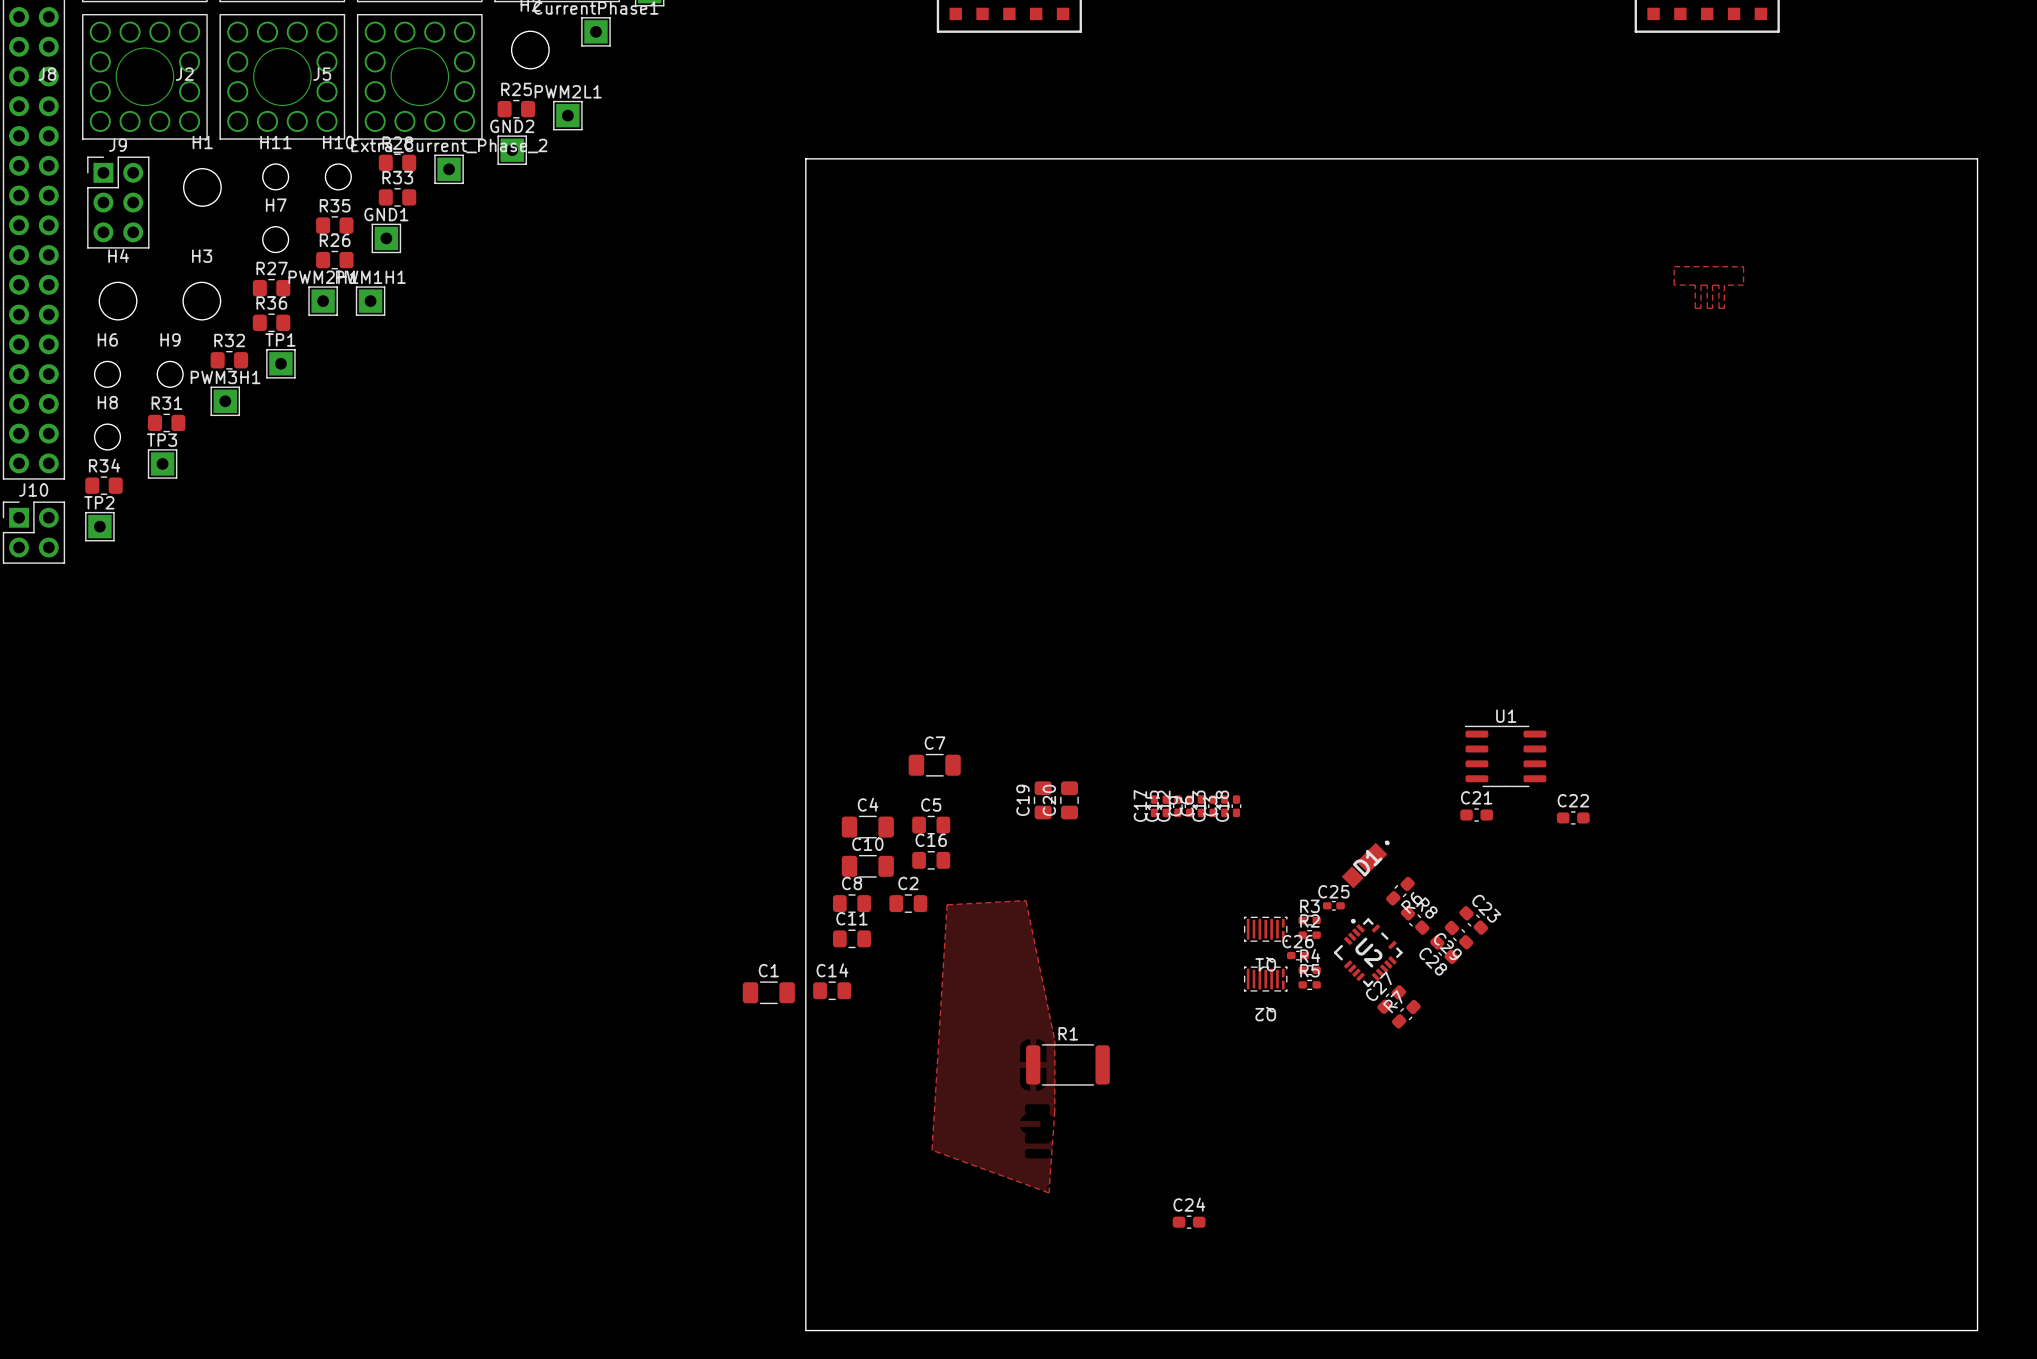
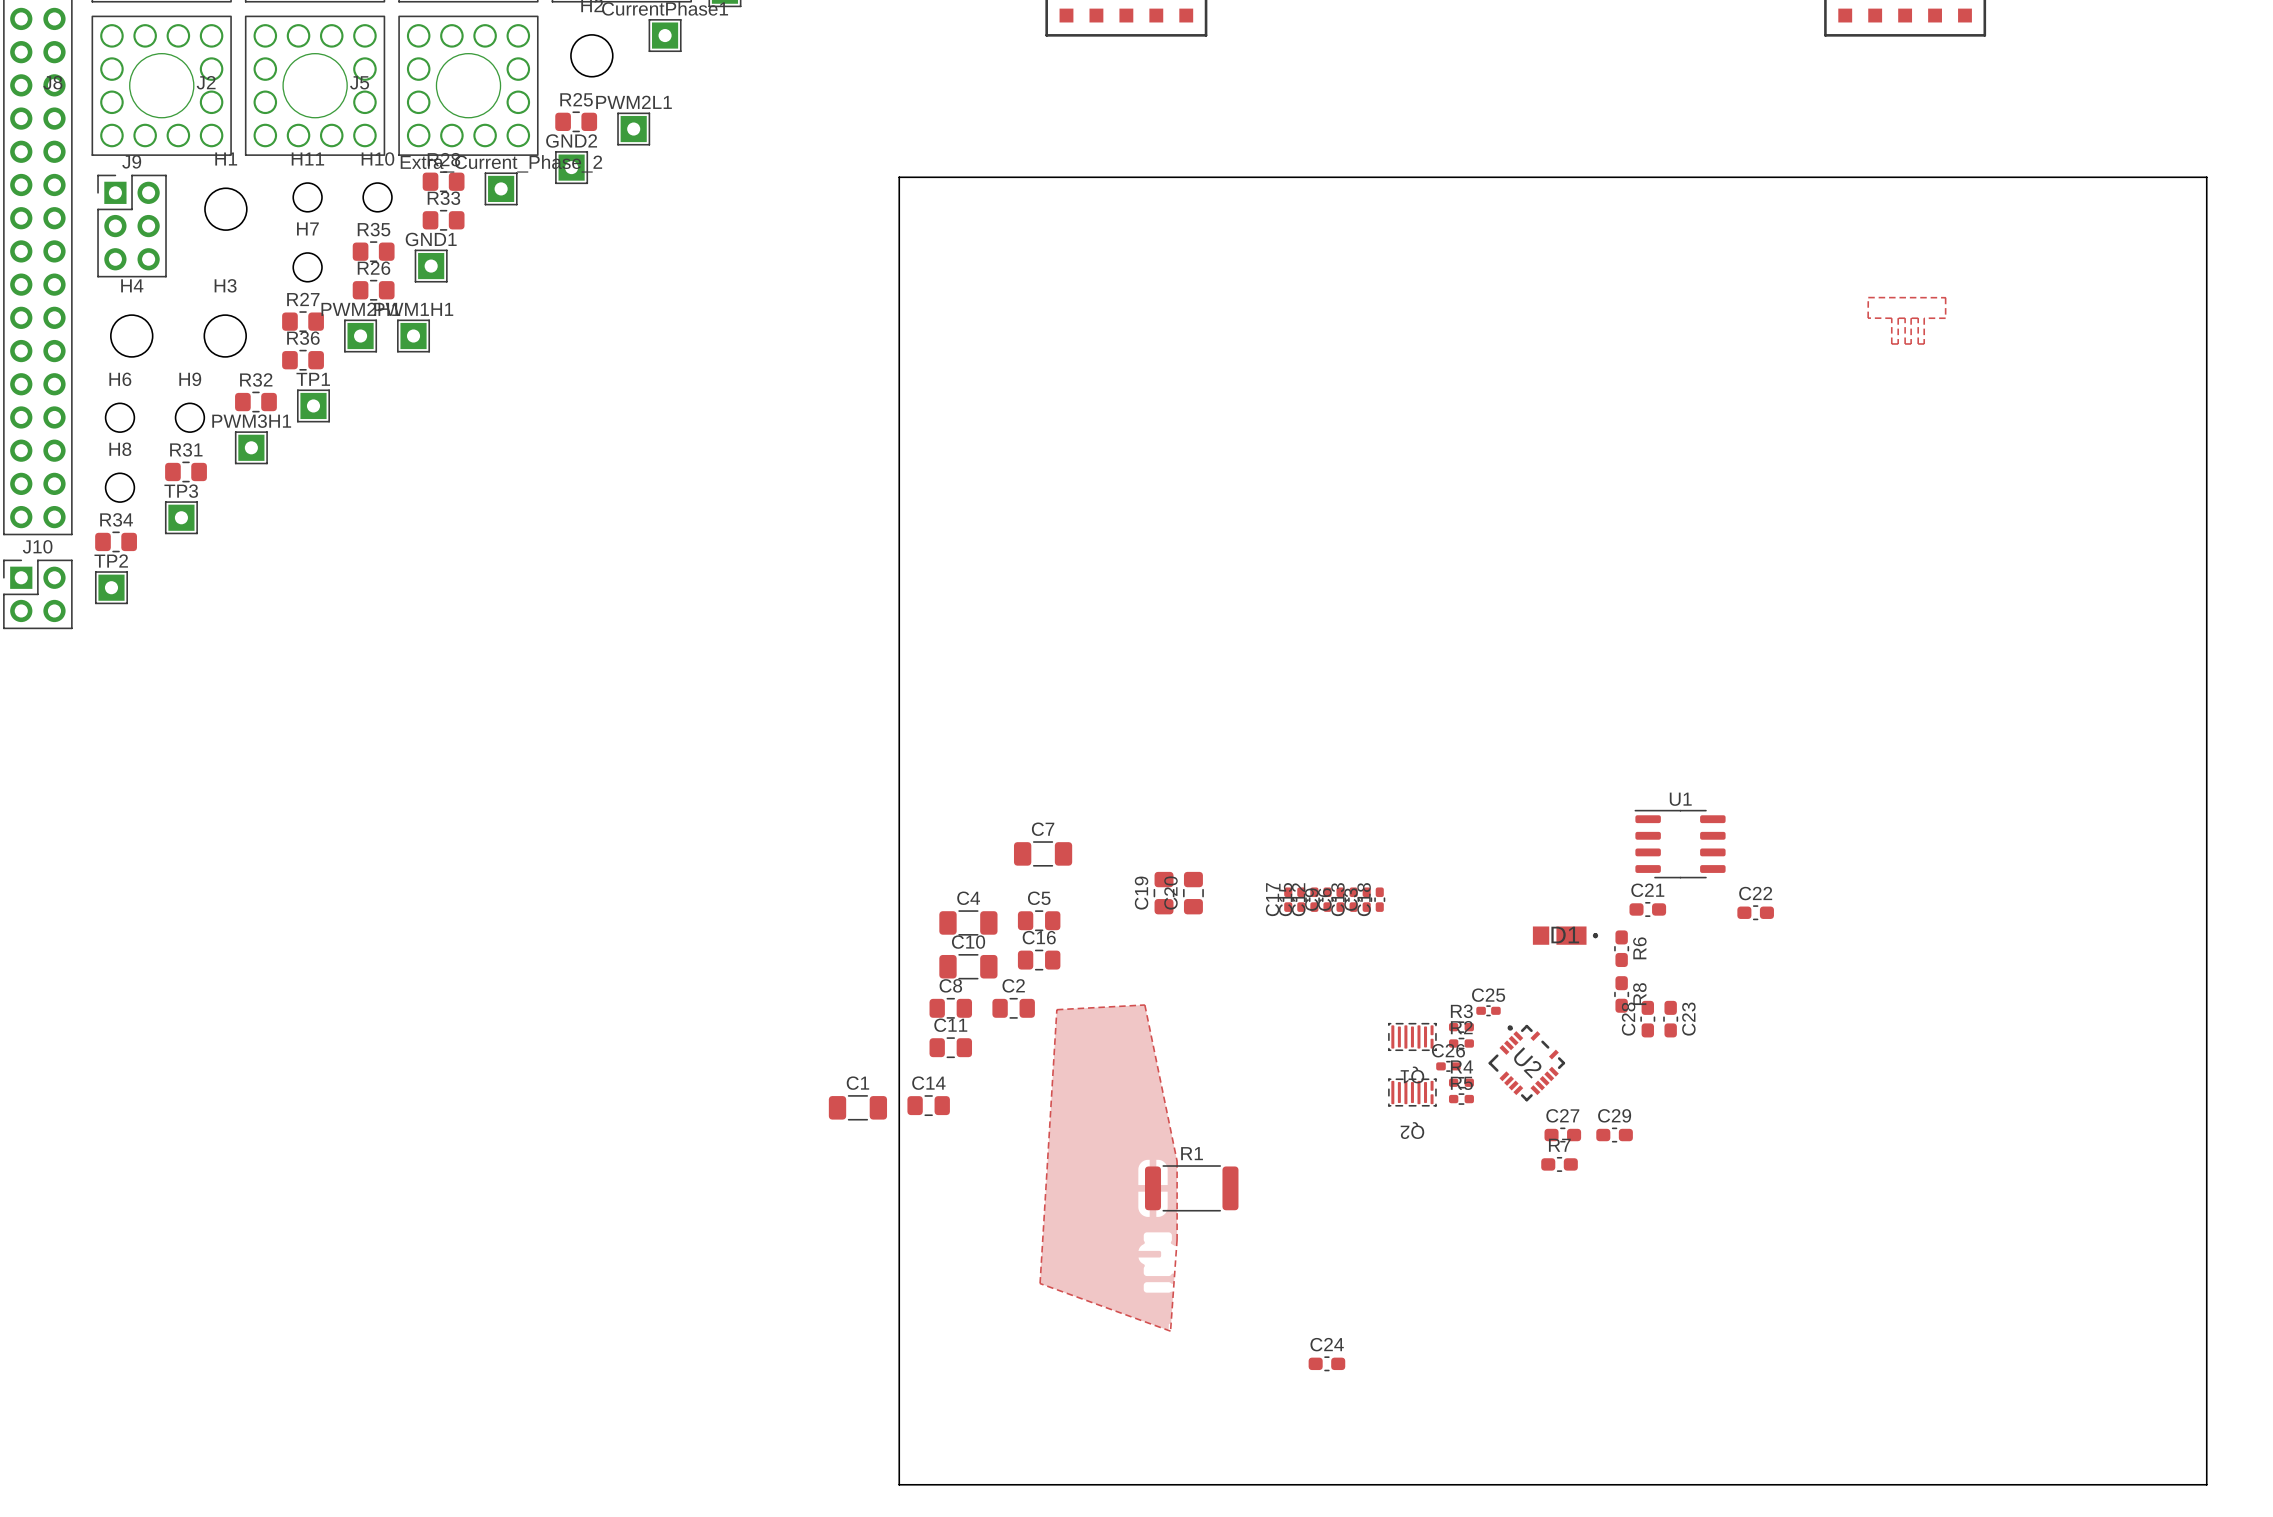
D1 rotation: 0° (1365, 864) -> 45° clockwise (1565, 935)
D1 position: (1365, 864) -> (1565, 935)
R6 rotation: 0° (1400, 891) -> 45° counterclockwise (1621, 948)
R6 position: (1400, 891) -> (1621, 948)
R8 rotation: 0° (1415, 920) -> 45° clockwise (1621, 994)
R8 position: (1415, 920) -> (1621, 994)
C23 rotation: 0° (1473, 920) -> 45° clockwise (1670, 1019)
C23 position: (1473, 920) -> (1670, 1019)
C29 rotation: 0° (1459, 935) -> 45° counterclockwise (1614, 1135)
C29 position: (1459, 935) -> (1614, 1135)
C29 name position: C29 (1447, 946) -> C29 (1614, 1115)
C28 rotation: 0° (1444, 949) -> 45° clockwise (1647, 1019)
C28 position: (1444, 949) -> (1647, 1019)
C27 rotation: 0° (1391, 999) -> 45° clockwise (1562, 1135)
C27 position: (1391, 999) -> (1562, 1135)
R7 rotation: 0° (1406, 1014) -> 45° clockwise (1559, 1164)
R7 position: (1406, 1014) -> (1559, 1164)

